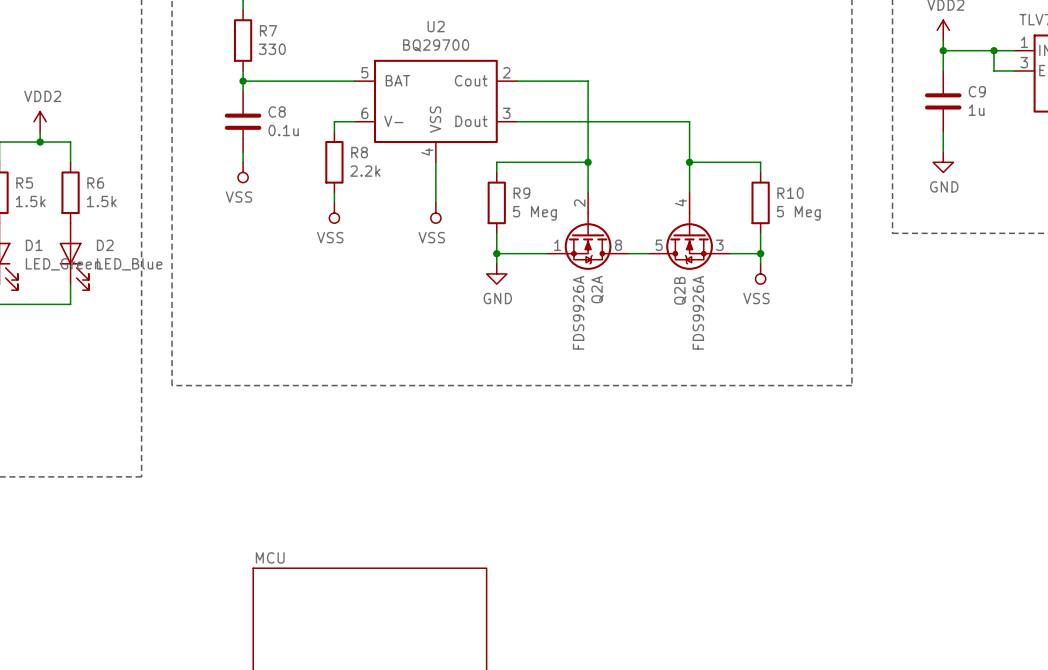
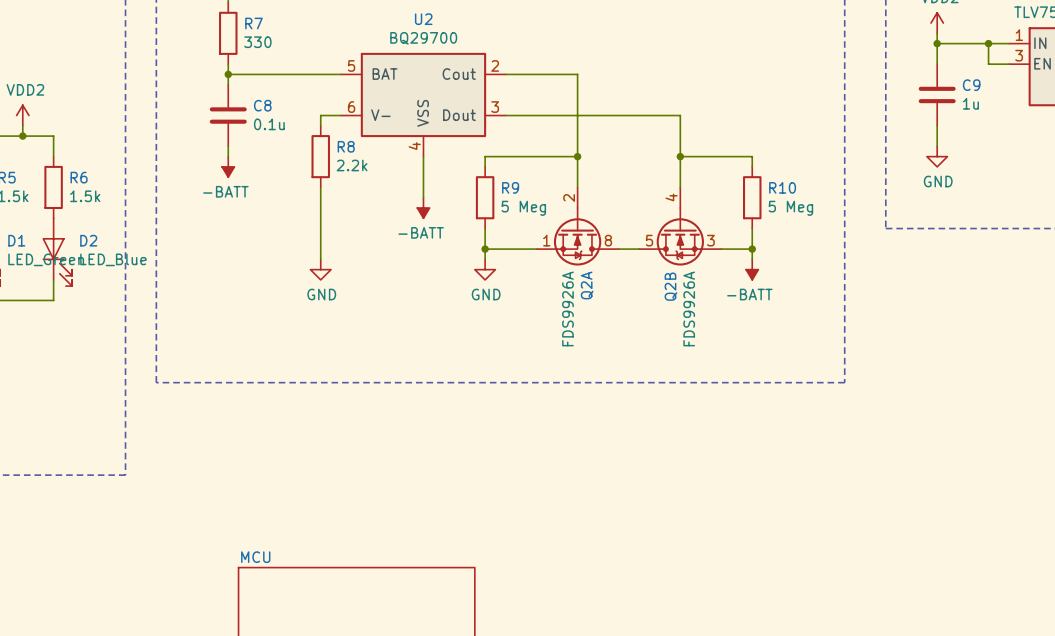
power symbol: VSS (243, 172) -> -BATT (228, 166)
wire: none -> (320, 197) (320, 259)
power symbol: VSS (334, 213) -> none
power symbol: VSS (435, 213) -> -BATT (423, 207)
power symbol: none -> GND (320, 269)
power symbol: VSS (760, 273) -> -BATT (752, 269)

